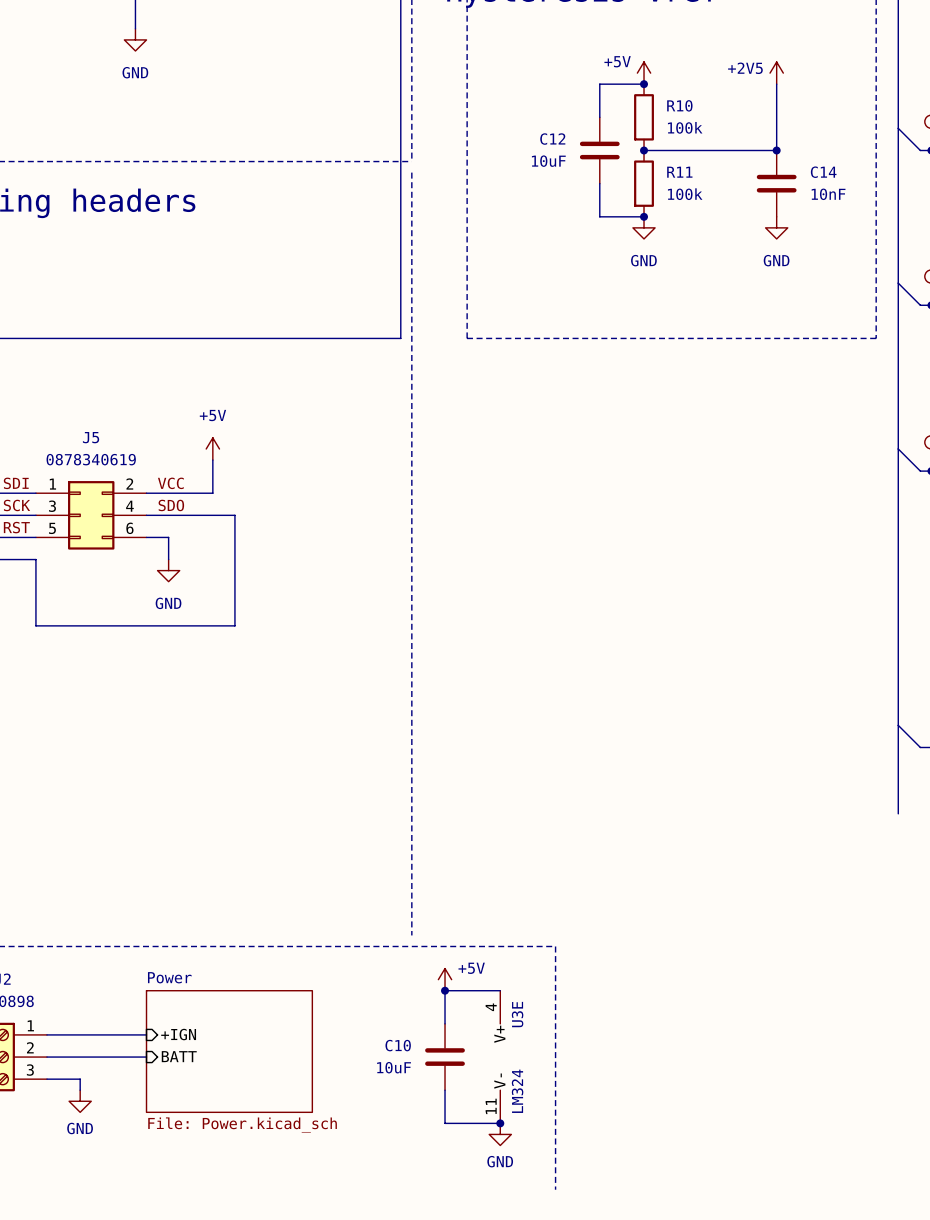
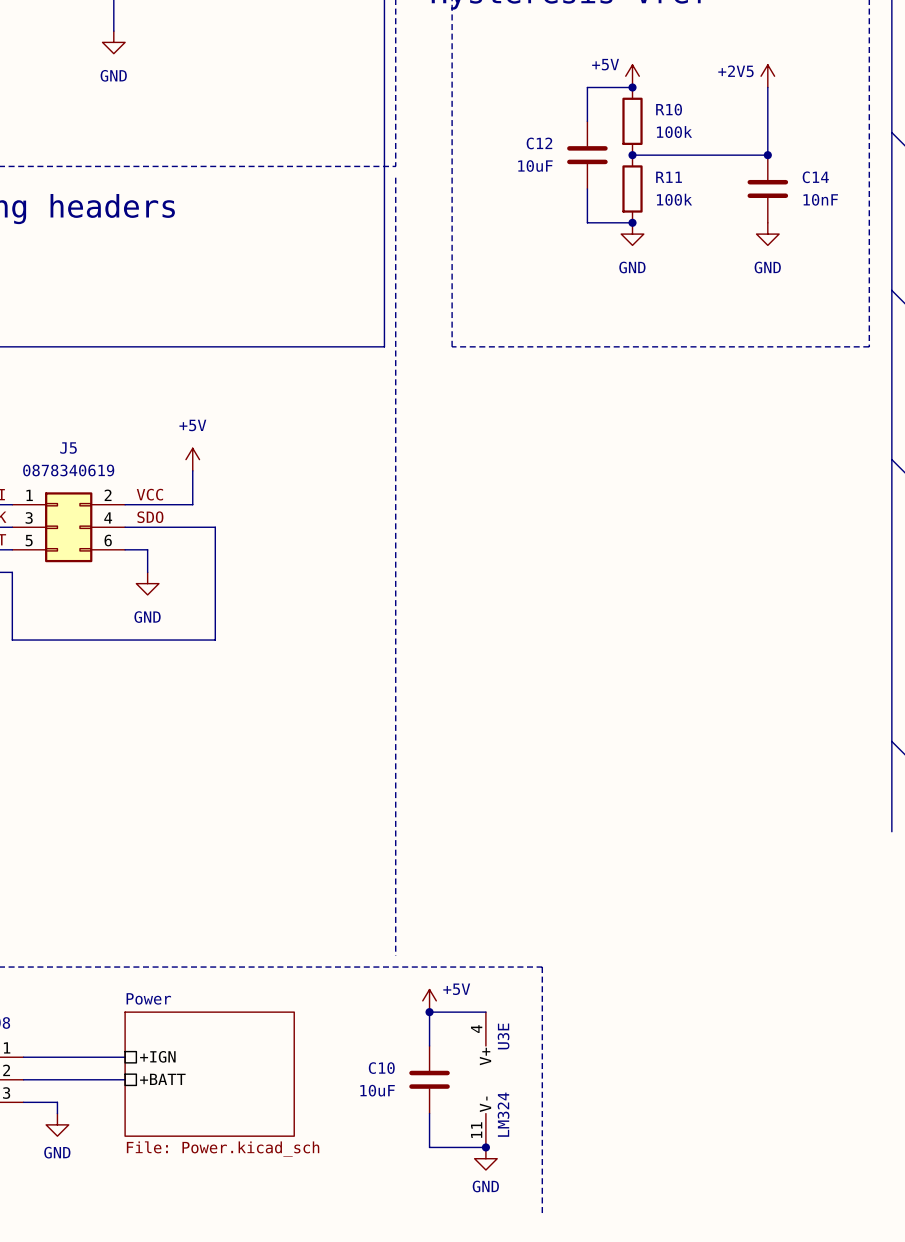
sheet pin shape: input (178, 1034) -> passive (157, 1056)
sheet pin shape: input (179, 1056) -> passive (162, 1079)
sheet pin: BATT (179, 1056) -> +BATT (162, 1079)

